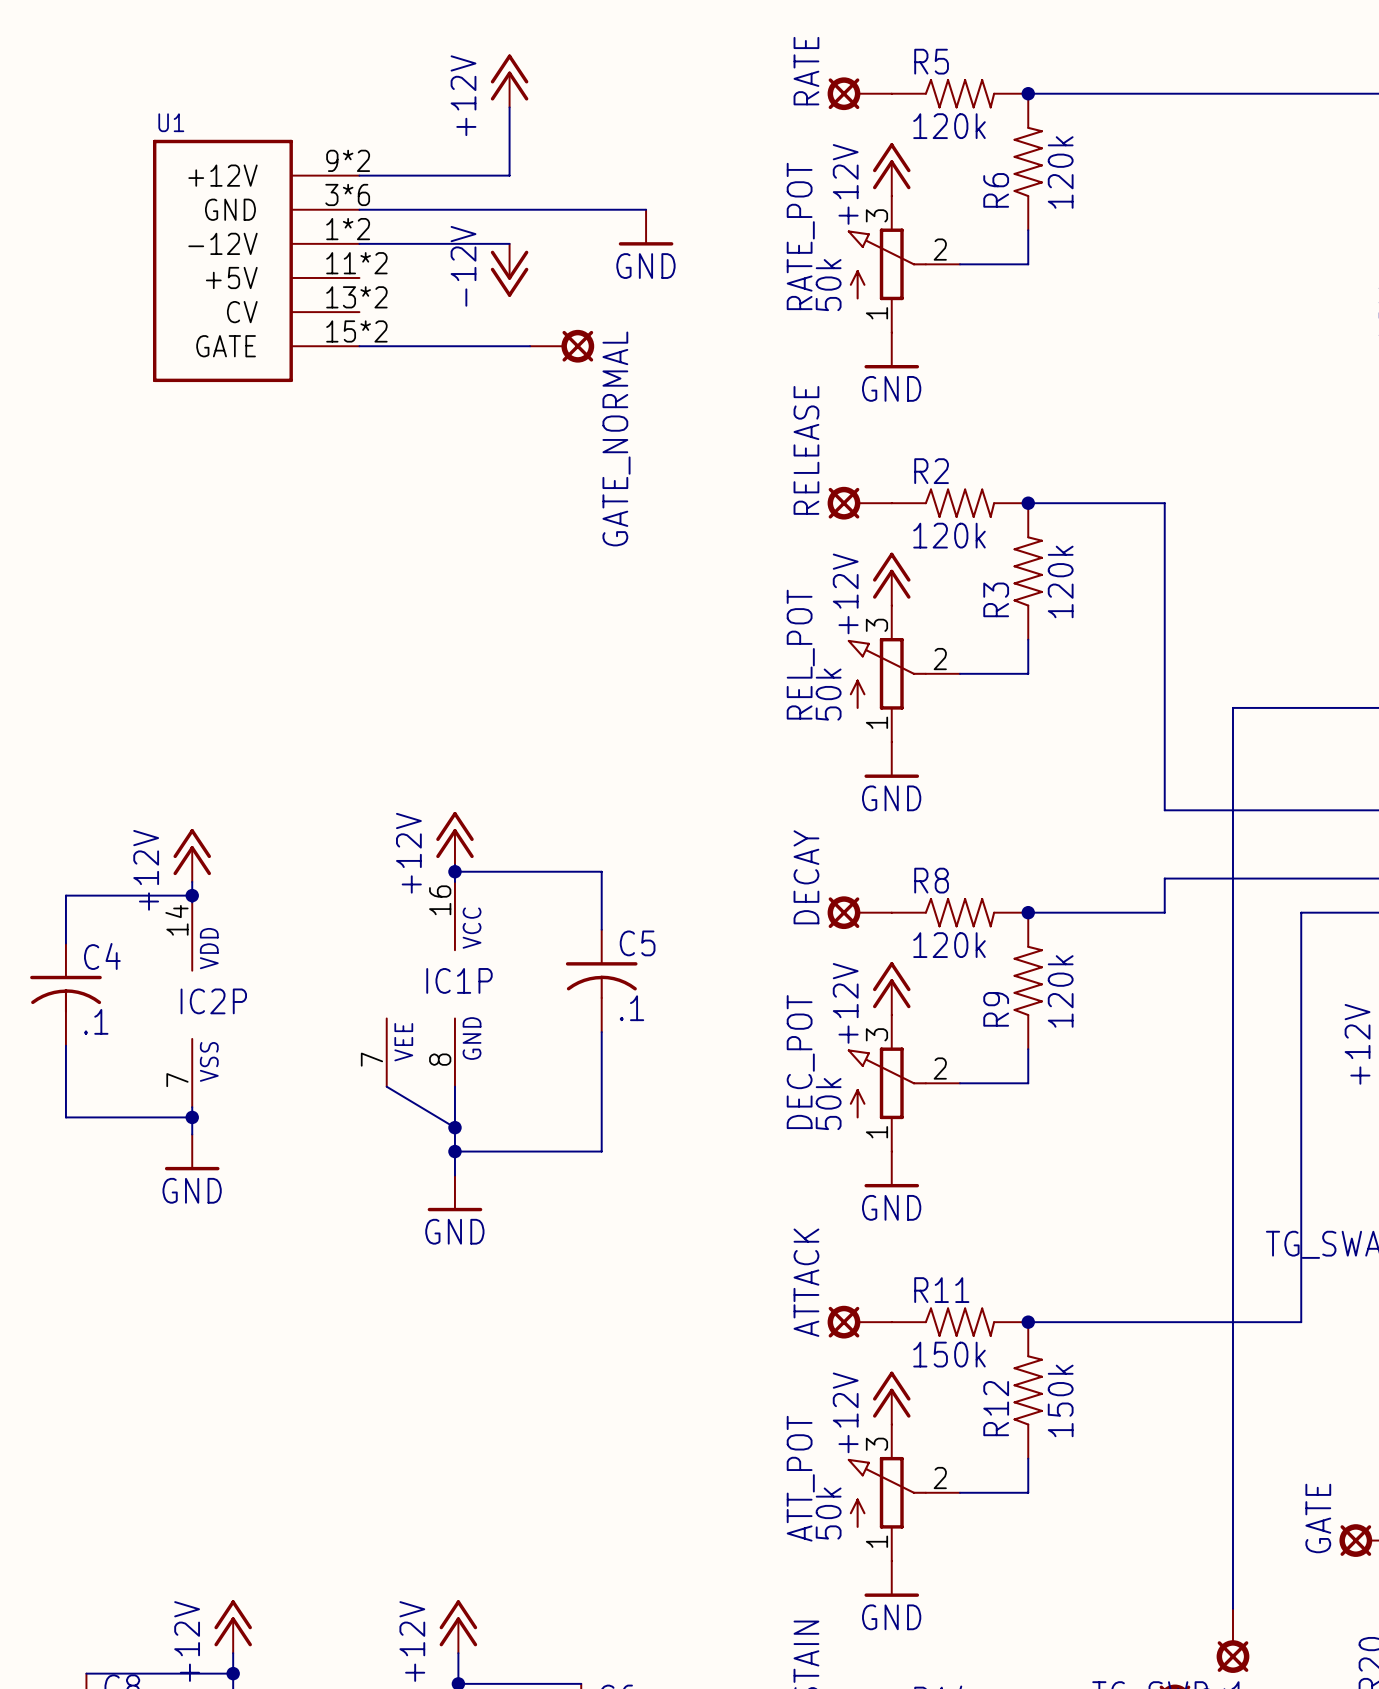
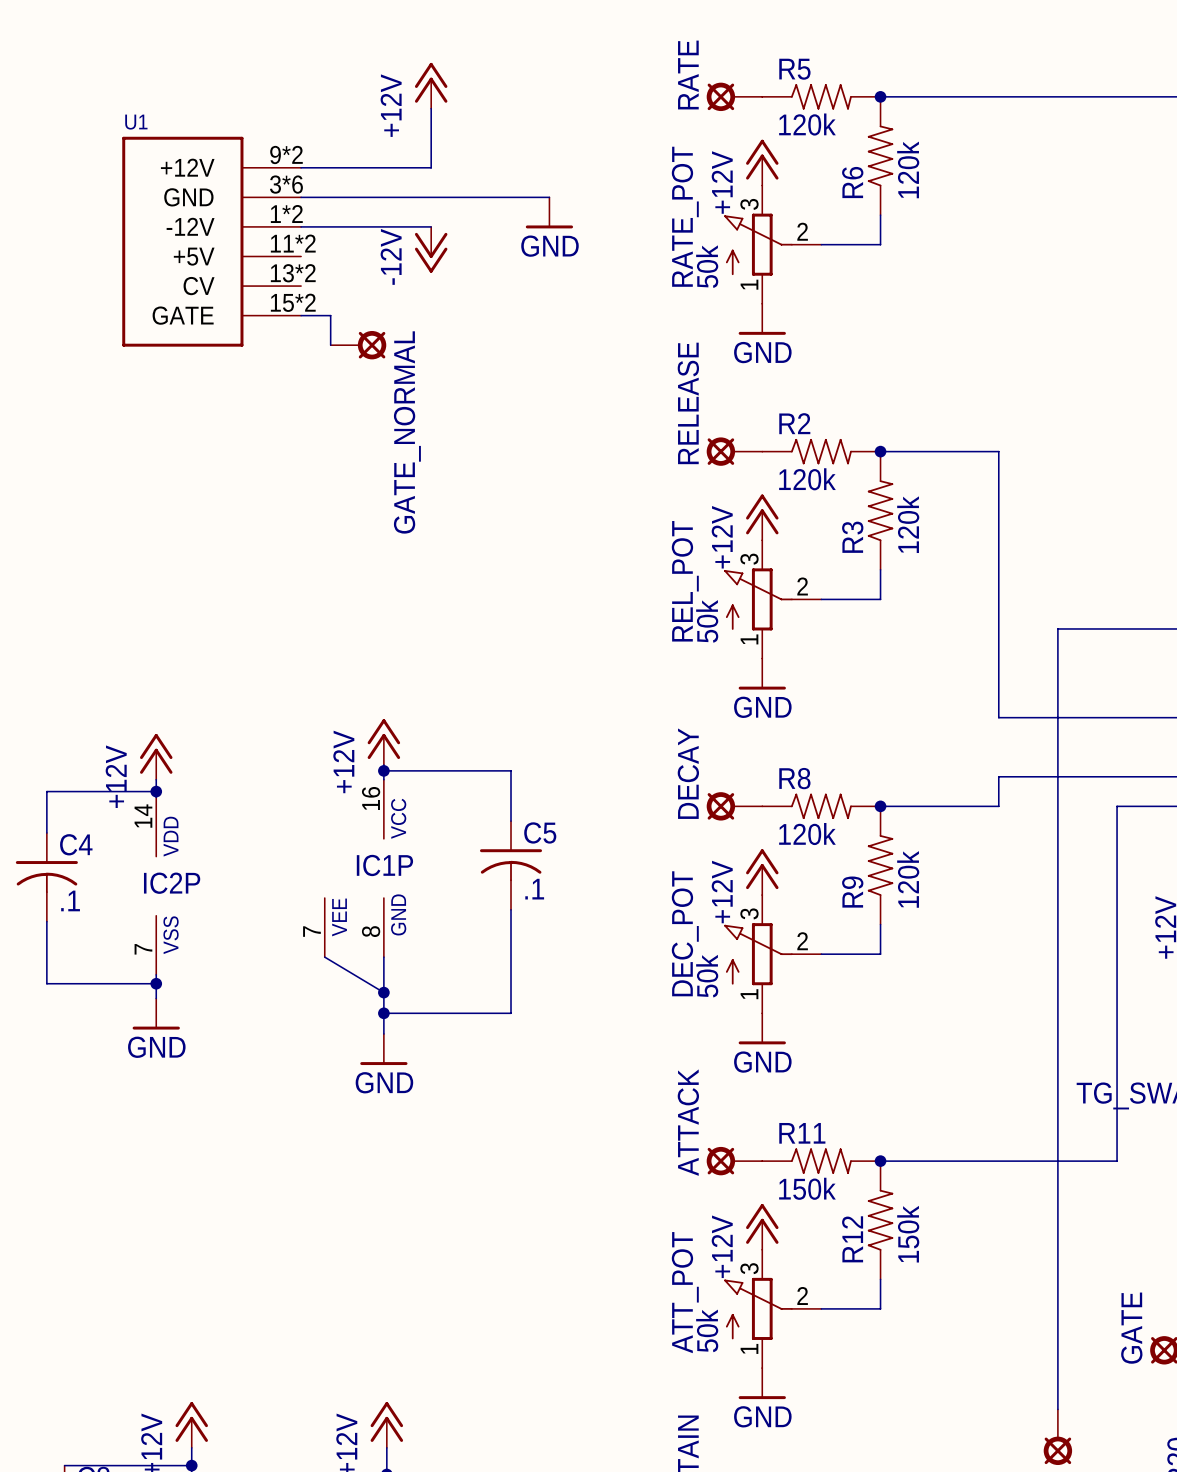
wire: (393, 346) (530, 346) -> (330, 315) (330, 345)
GATE_NORMAL position: (562, 346) -> (358, 345)

